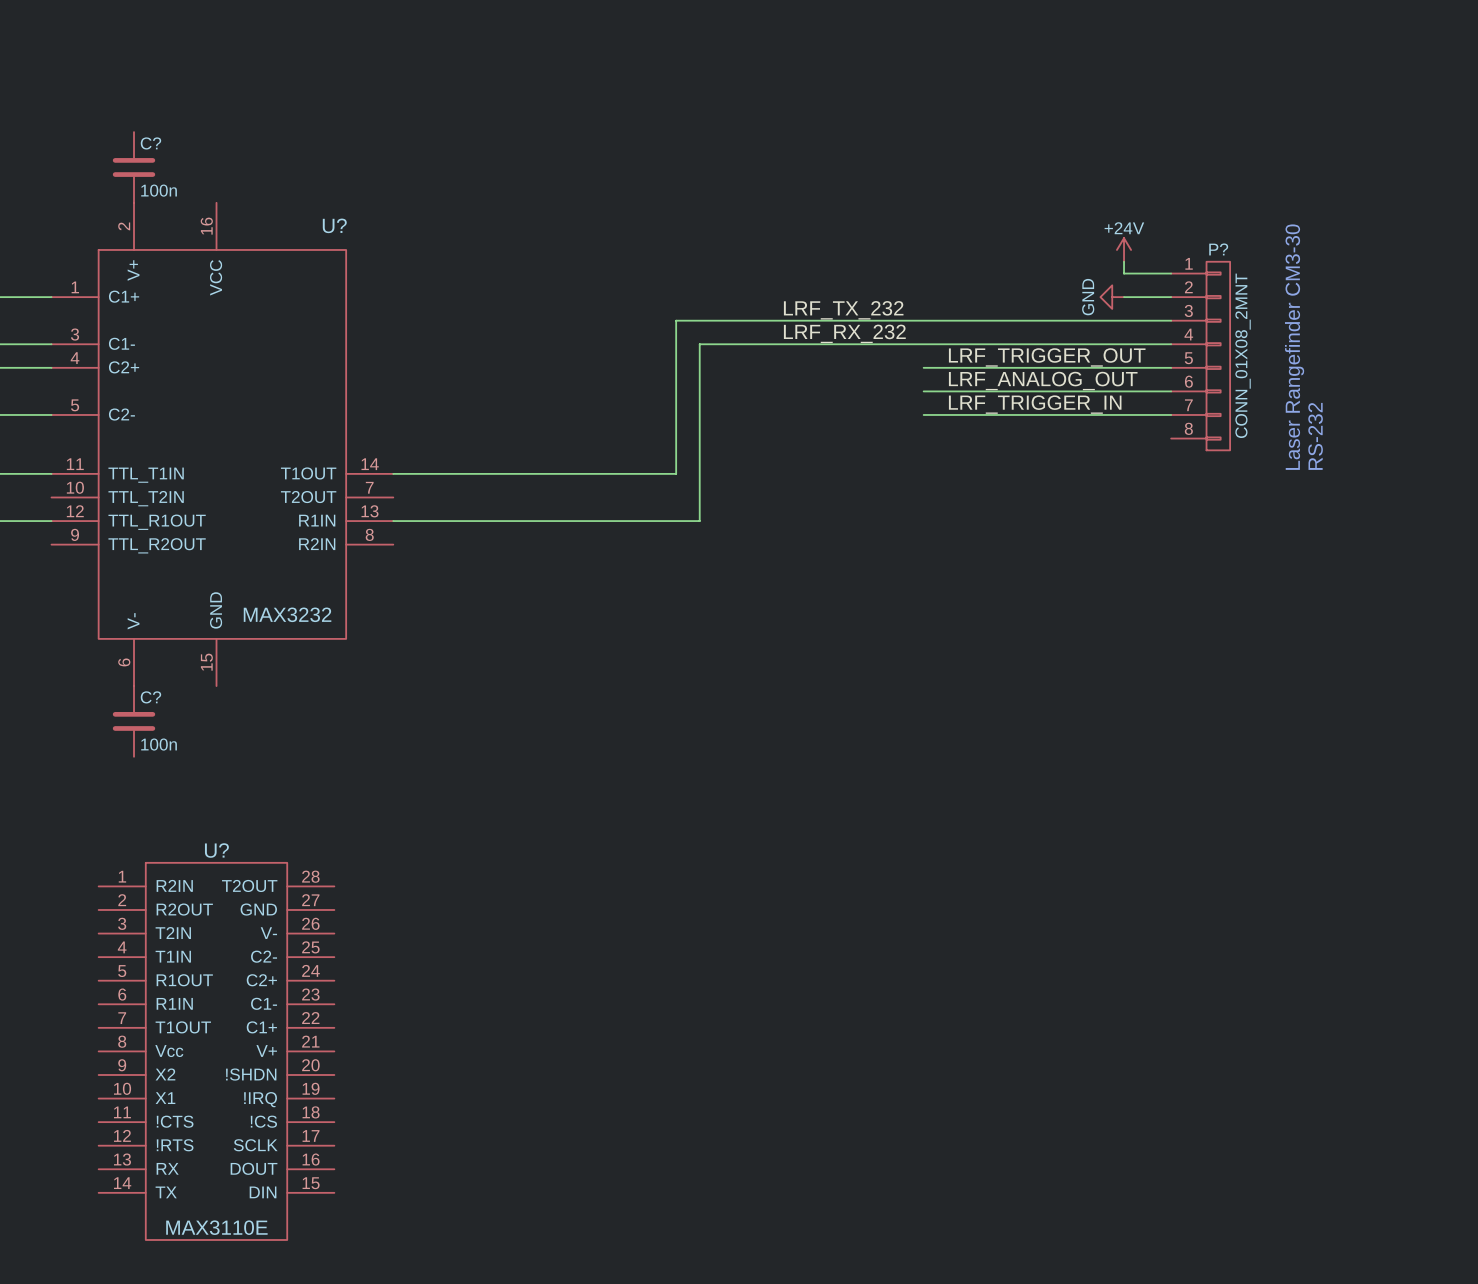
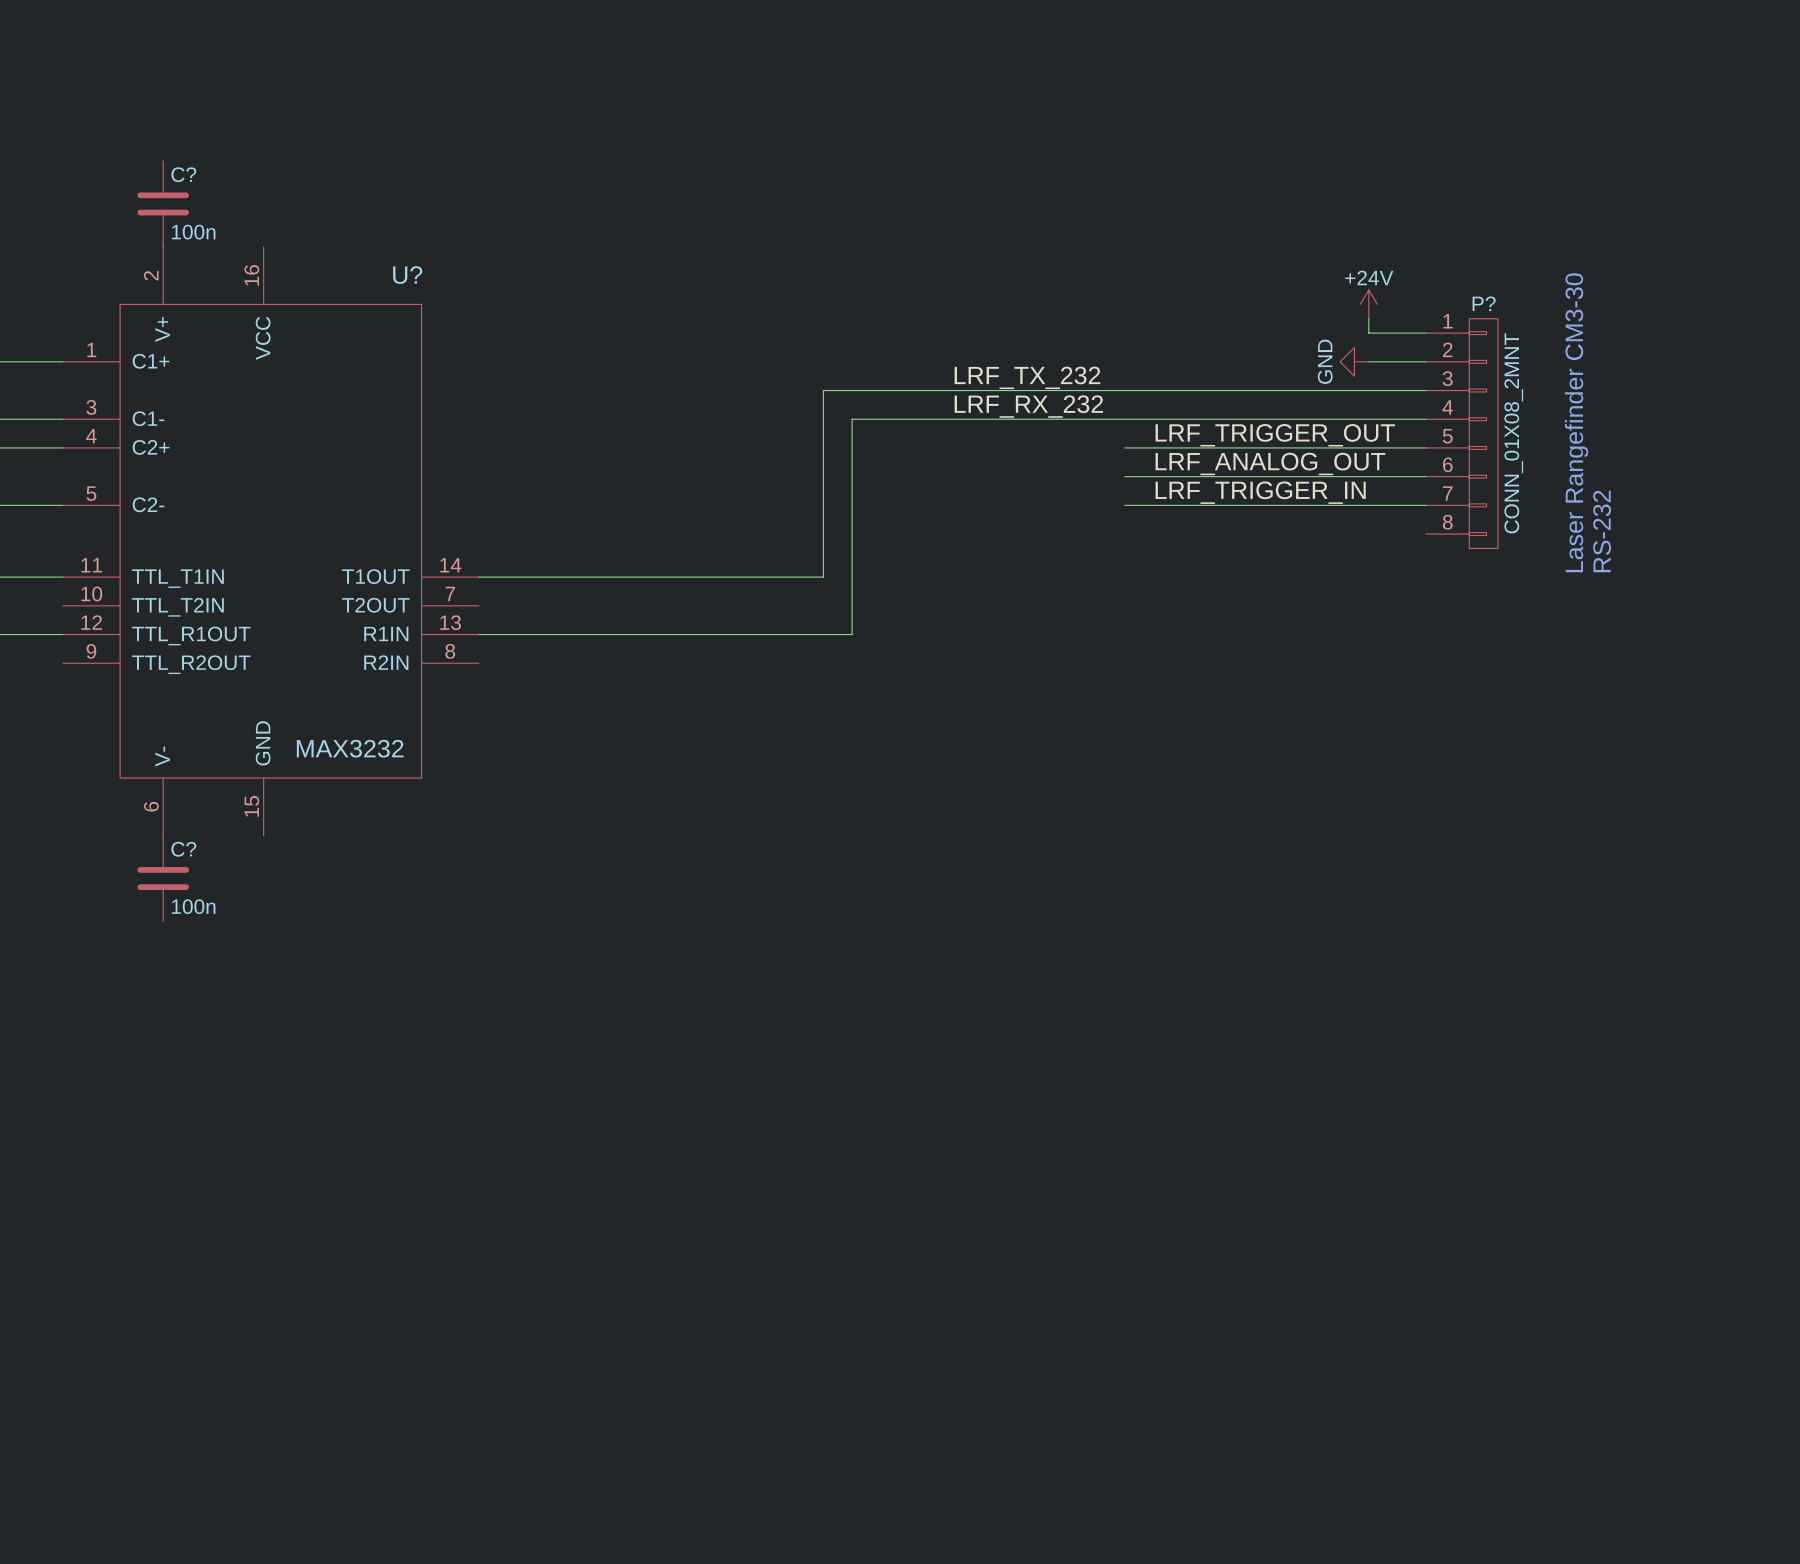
U?: MAX3110E (216, 1051) -> none

